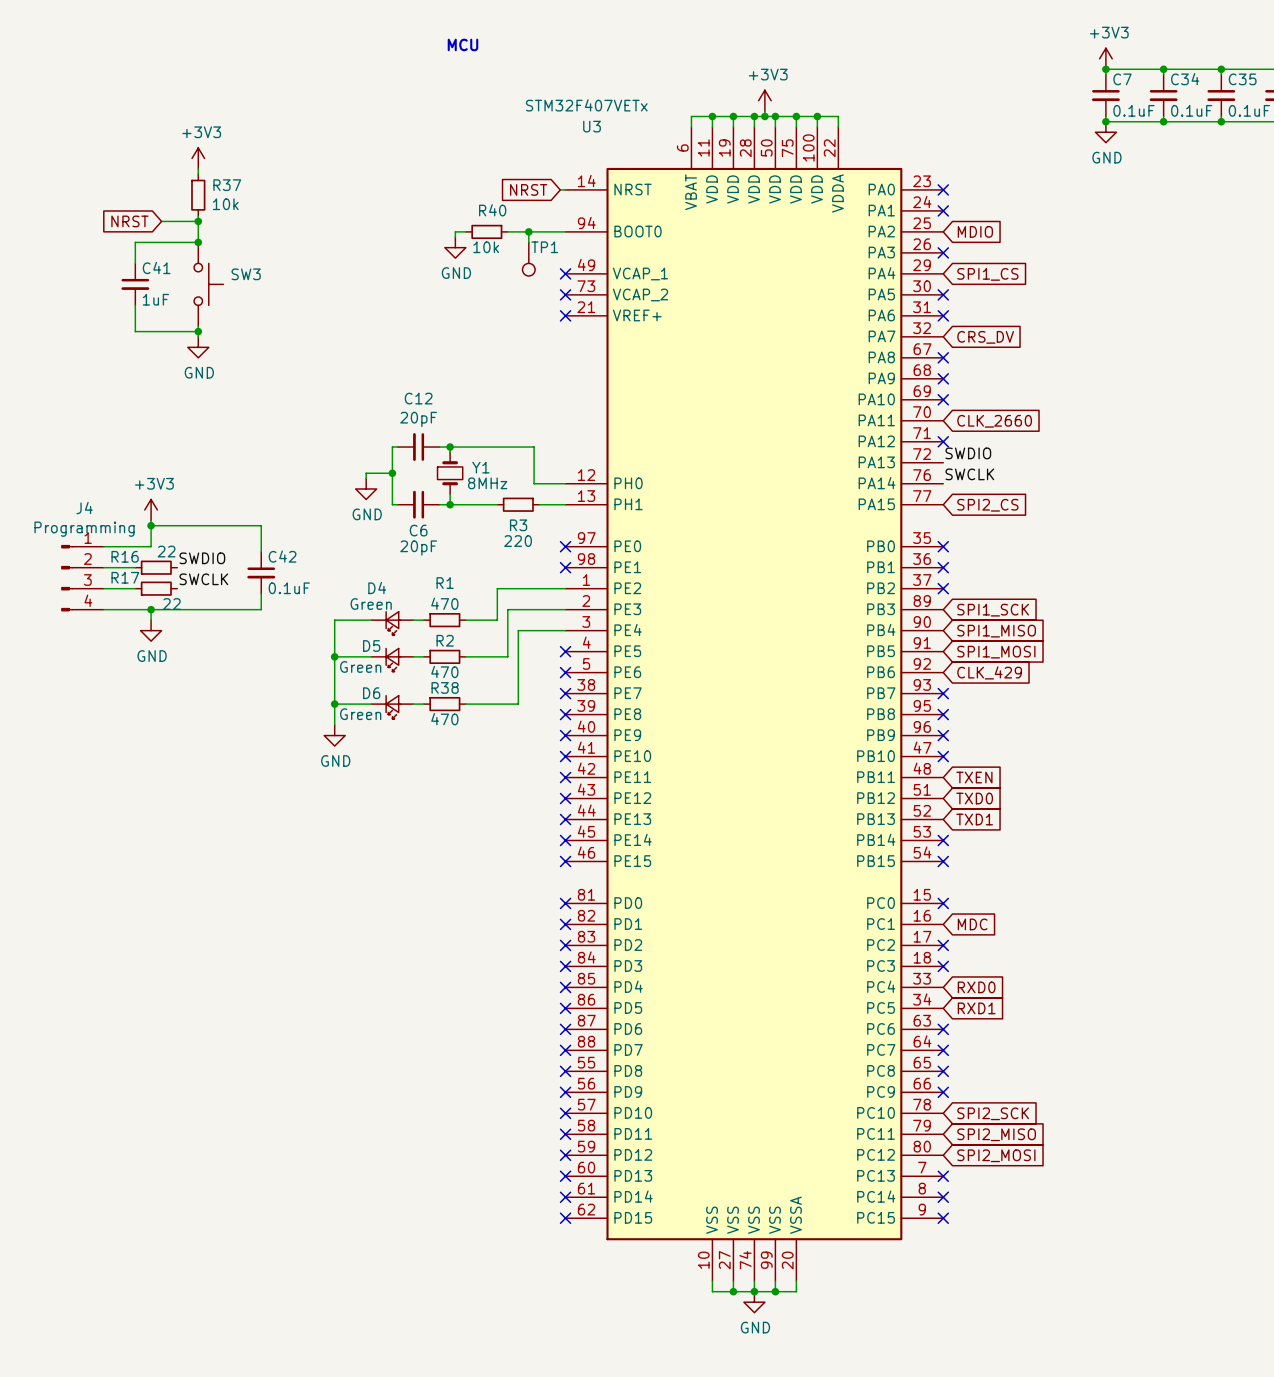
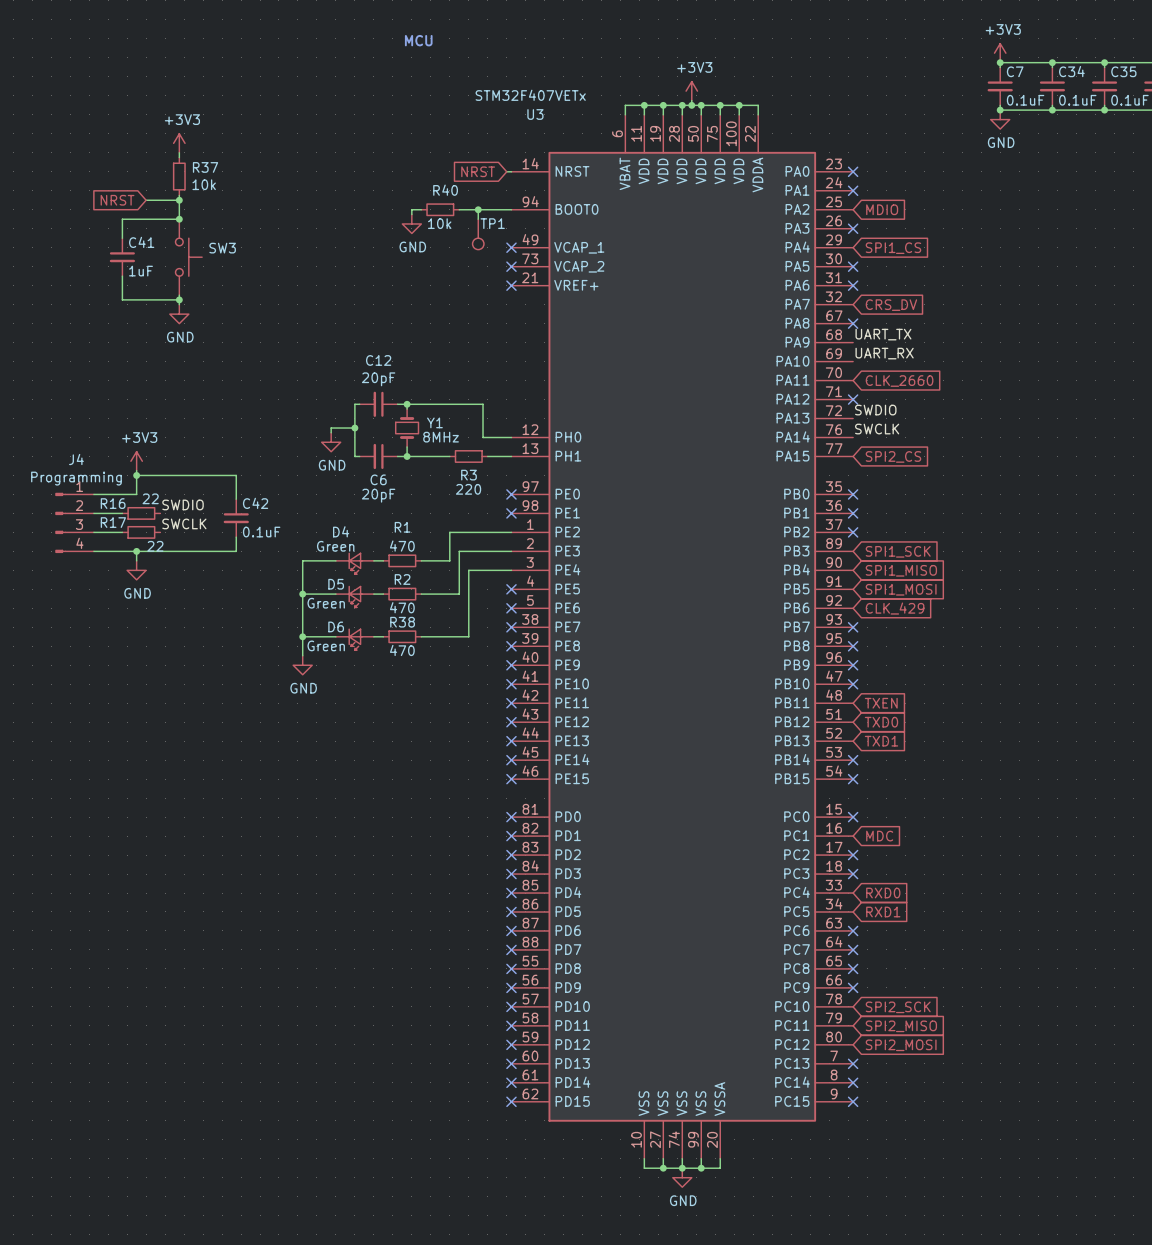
label: none -> UART_TX (883, 334)
no-connect mark: (943, 378) -> none
label: none -> UART_RX (884, 353)
no-connect mark: (943, 399) -> none

